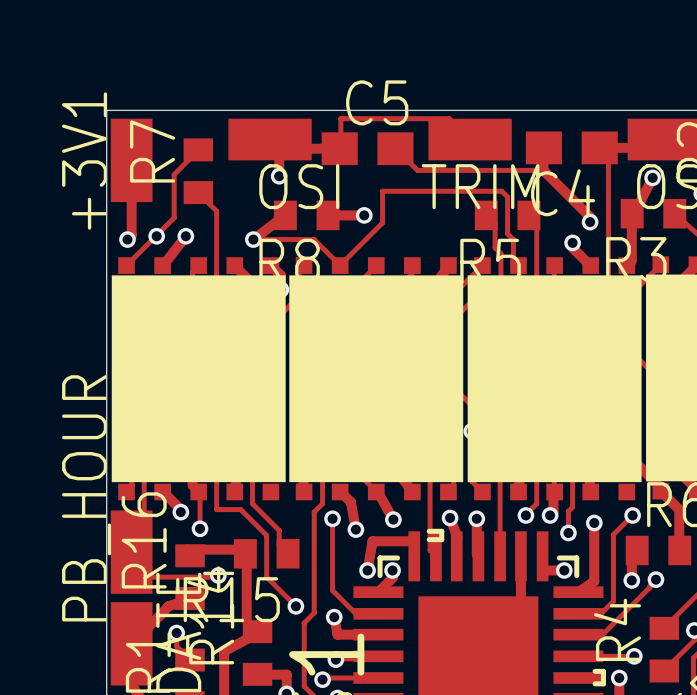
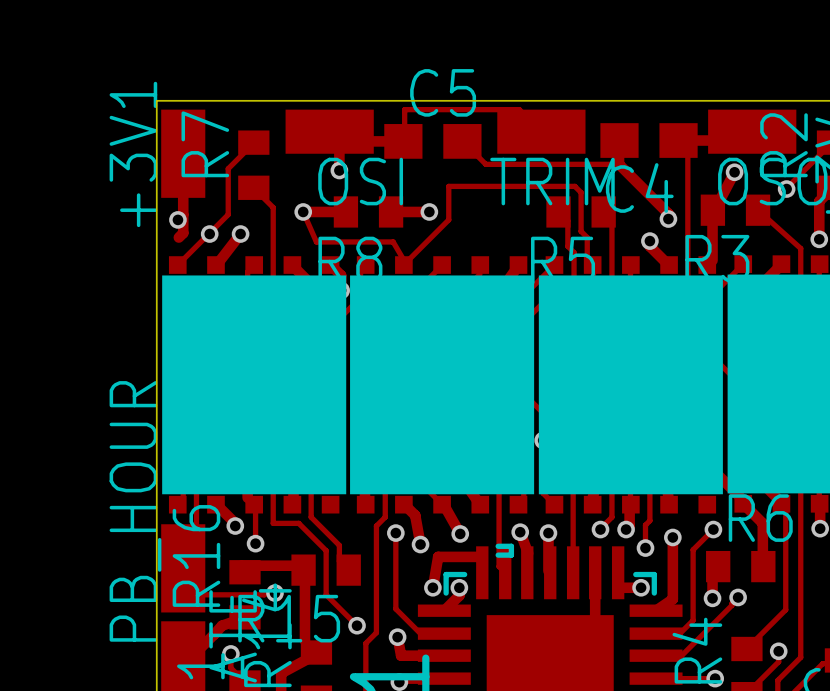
track: (285, 215) (253, 239) (314, 239) (340, 265) -> (345, 211) (303, 211) (316, 241) (393, 241) (405, 263)
via position: (127, 239) -> (177, 219)
via position: (253, 239) -> (303, 211)

